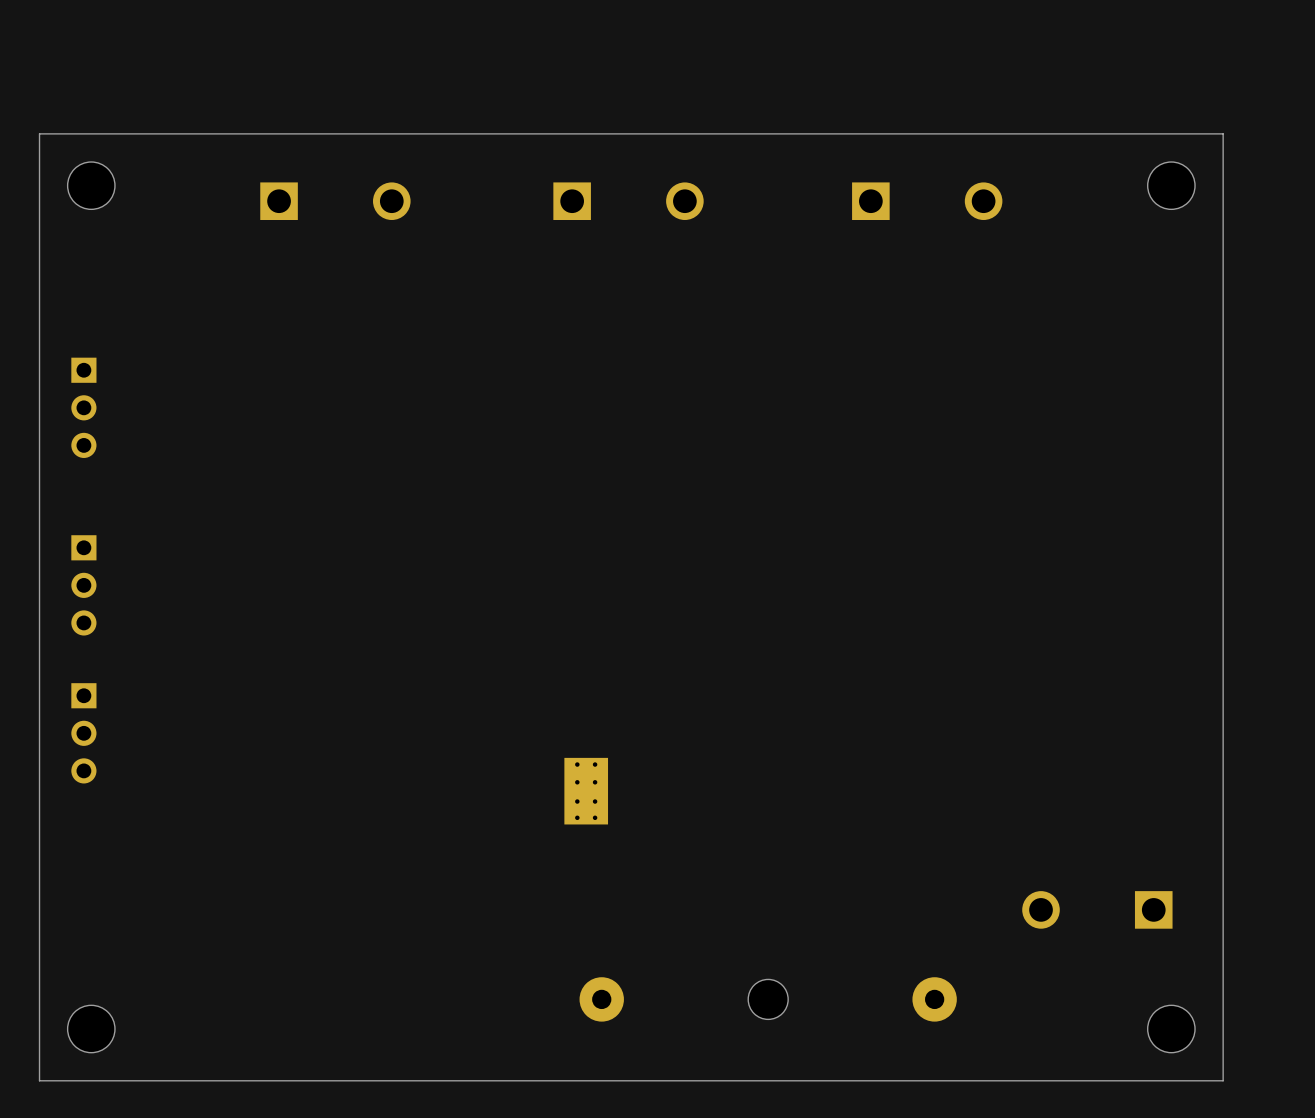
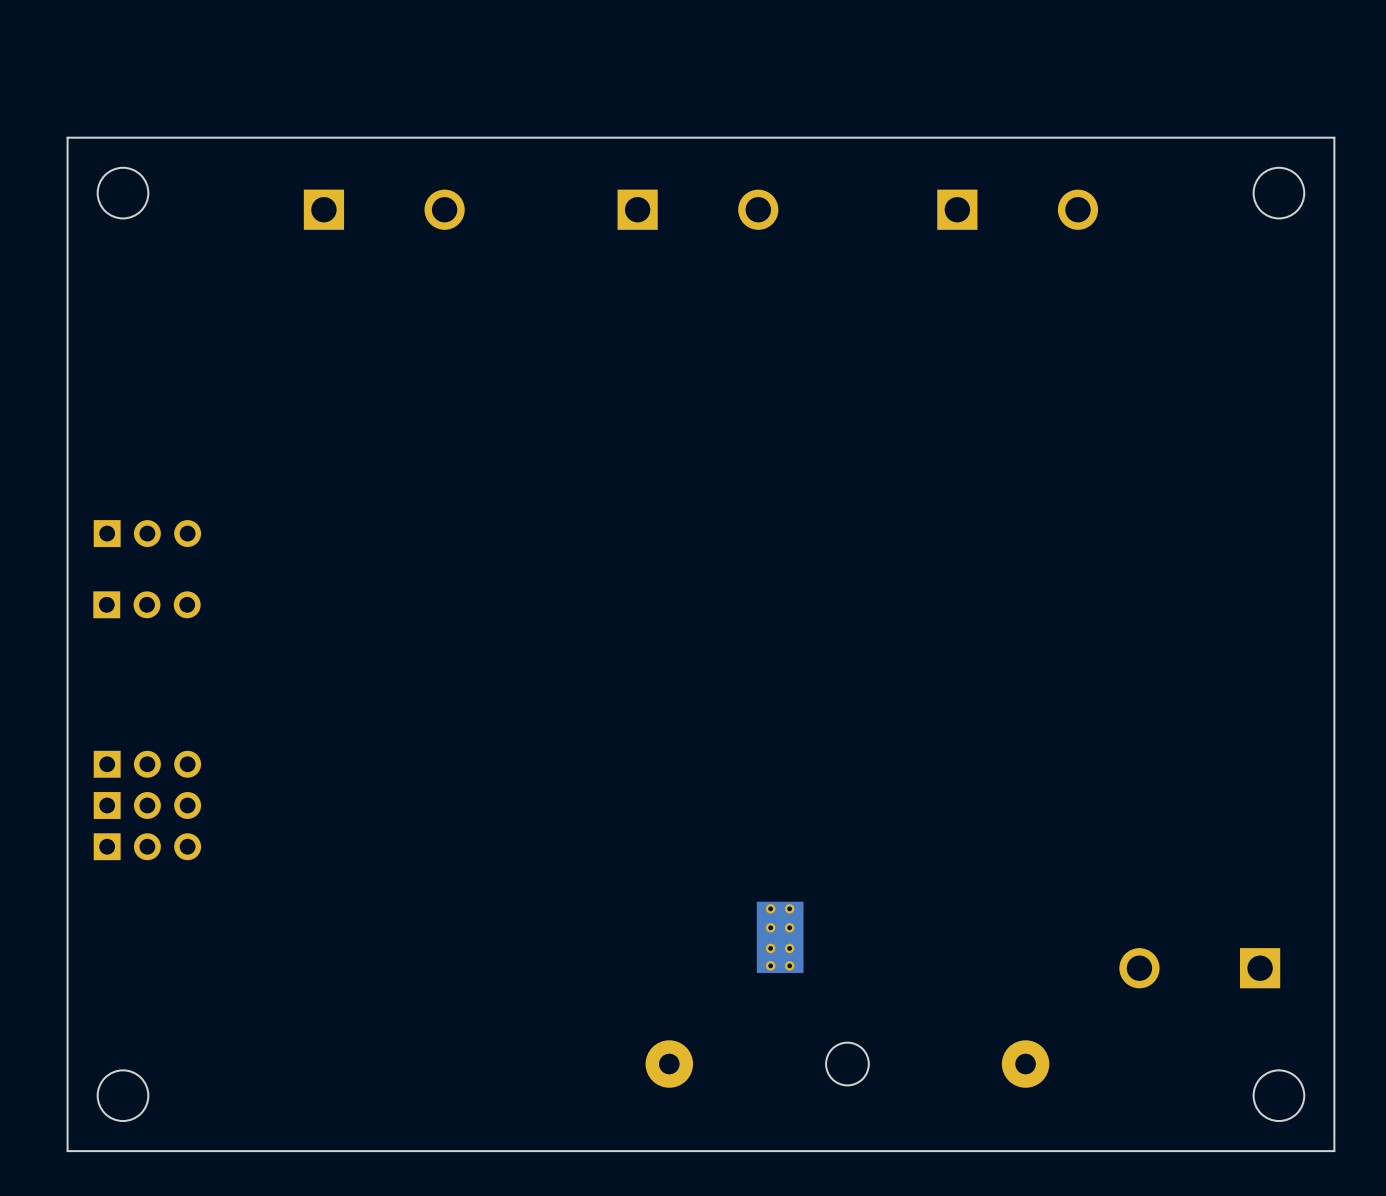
part: (83, 407) -> none
part: none -> (147, 533)
part rotation: 0° (83, 585) -> 90° counterclockwise (146, 604)
part: none -> (147, 764)
part: (83, 733) -> none
part: none -> (147, 805)
part position: (586, 791) -> (780, 937)
part: none -> (147, 846)

